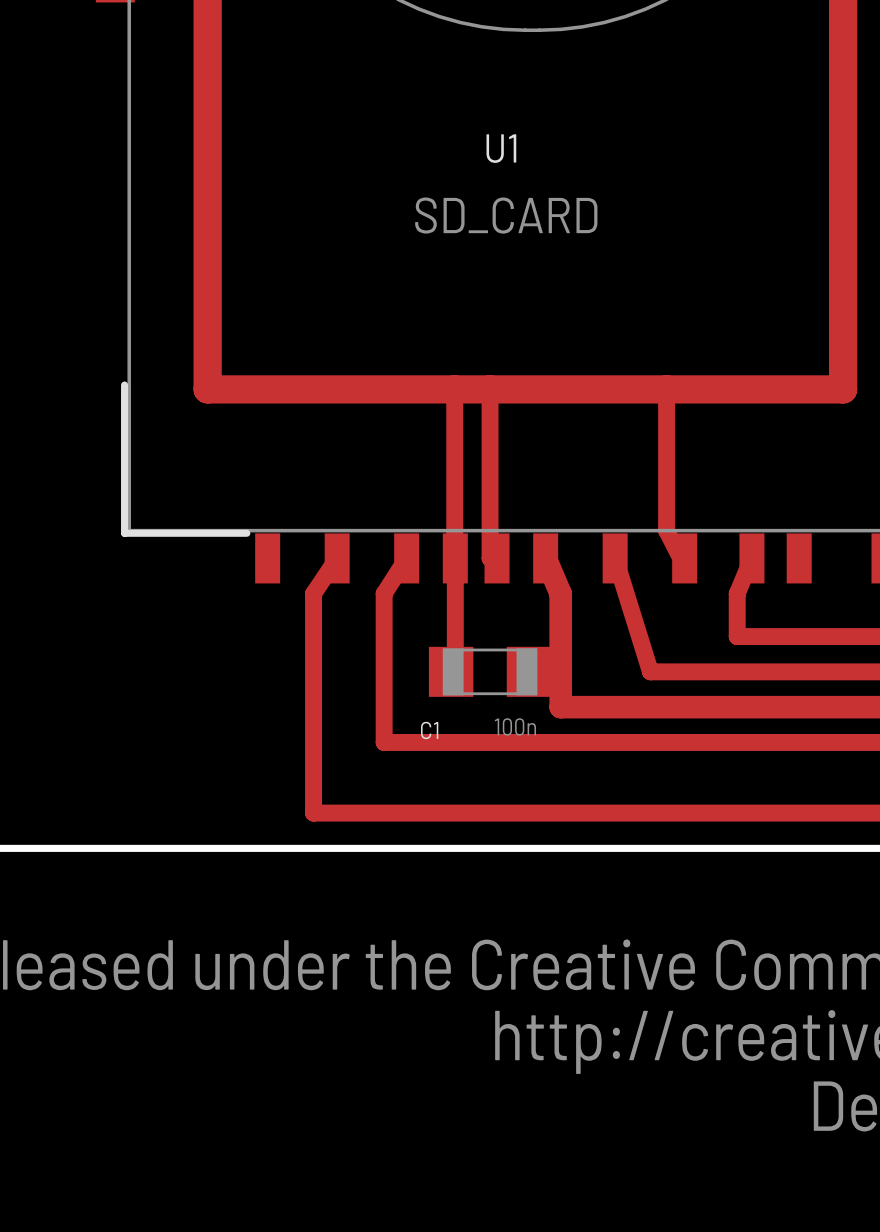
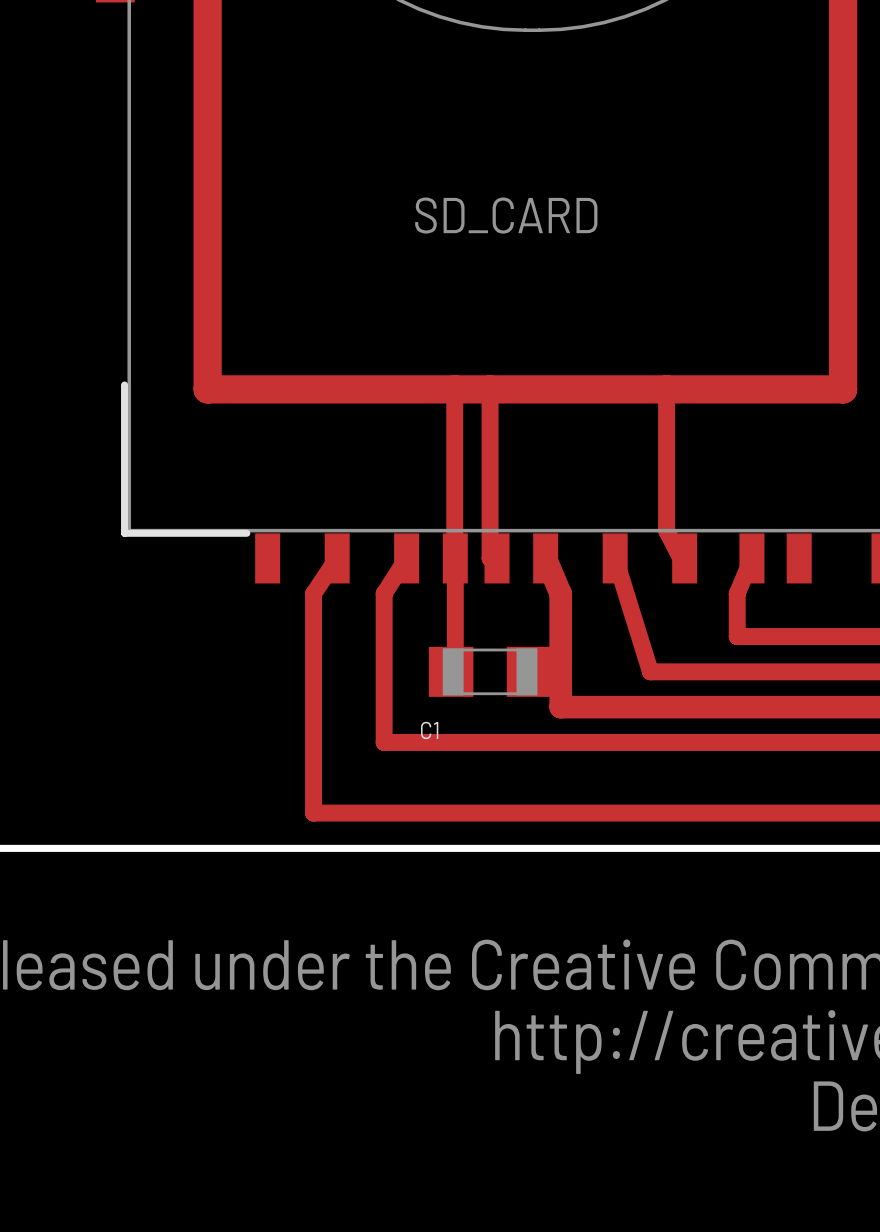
U1 name: U1 (501, 148) -> none
C1 value: 100n (515, 726) -> none

